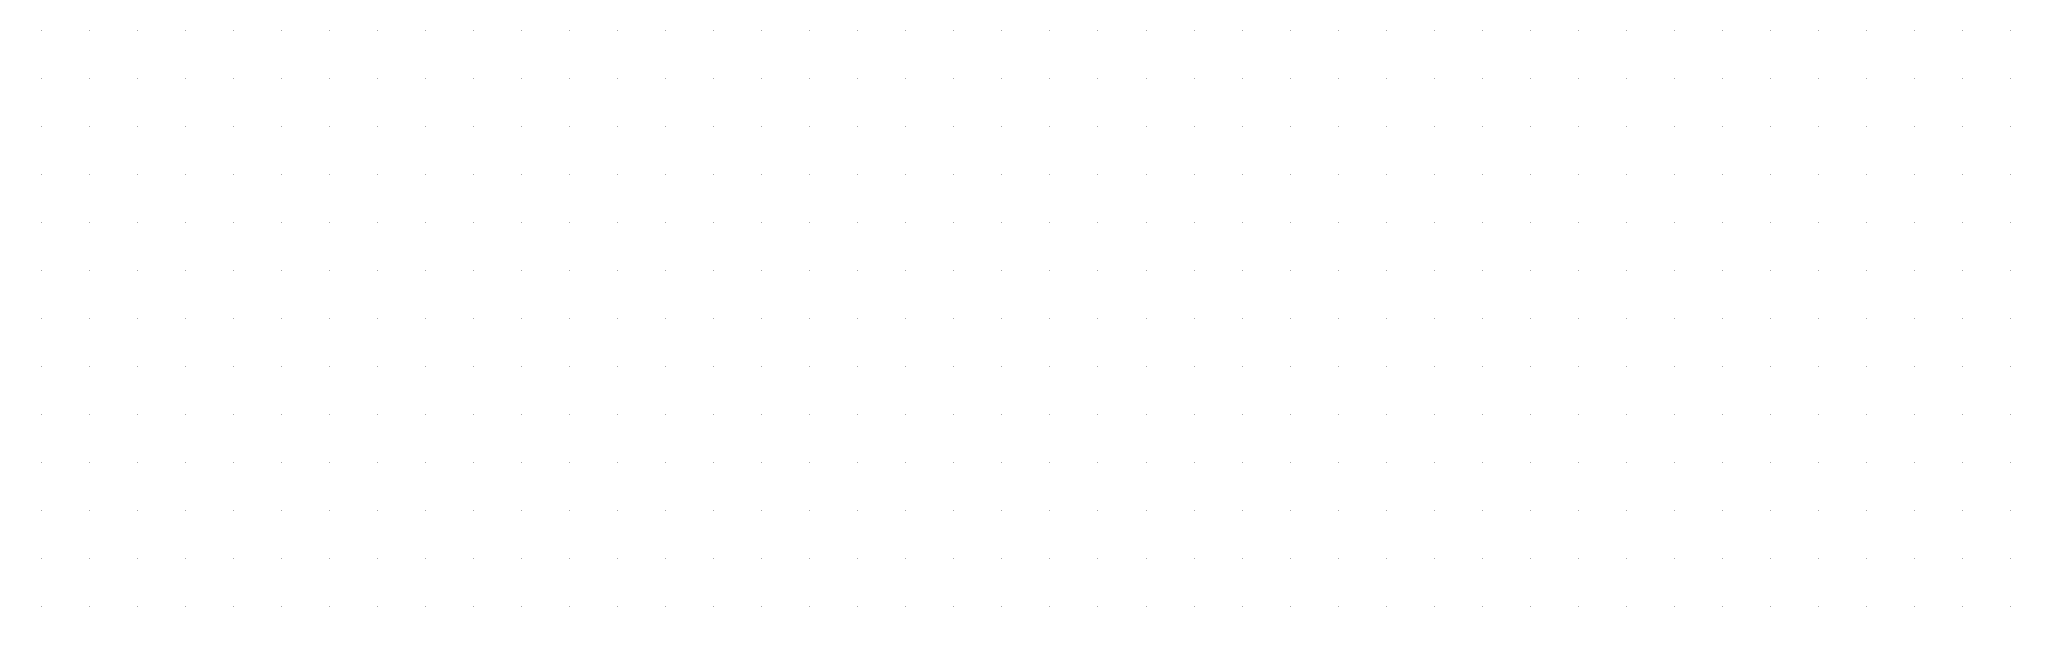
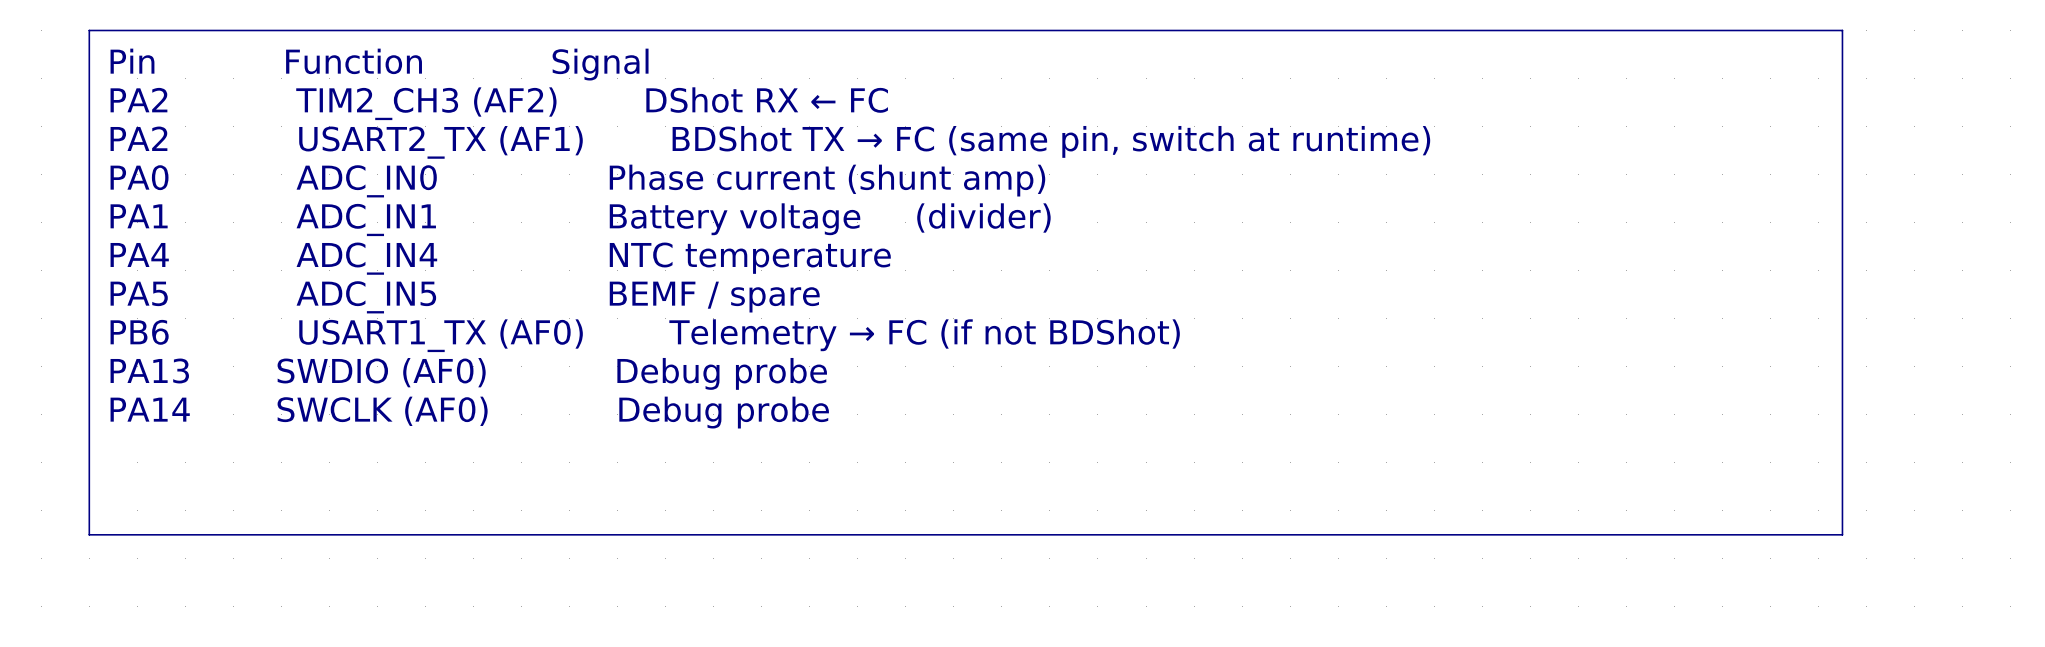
line: none -> (89, 30) (1842, 30) (1842, 534) (89, 534) (89, 30)
text: none -> Pin Function Signal (379, 64)
text: none -> PA2 TIM2_CH3 (AF2) DShot RX ← FC (499, 103)
text: none -> PA2 USART2_TX (AF1) BDShot TX → FC (same pin, switch at runtime) (770, 142)
text: none -> PA0 ADC_IN0 Phase current (shunt amp) (577, 181)
text: none -> PA1 ADC_IN1 Battery voltage (divider) (580, 219)
text: none -> PA4 ADC_IN4 NTC temperature (500, 258)
text: none -> PA5 ADC_IN5 BEMF / spare (465, 297)
text: none -> PB6 USART1_TX (AF0) Telemetry → FC (if not BDShot) (645, 335)
text: none -> PA13 SWDIO (AF0) Debug probe (468, 373)
text: none -> PA14 SWCLK (AF0) Debug probe (469, 412)

